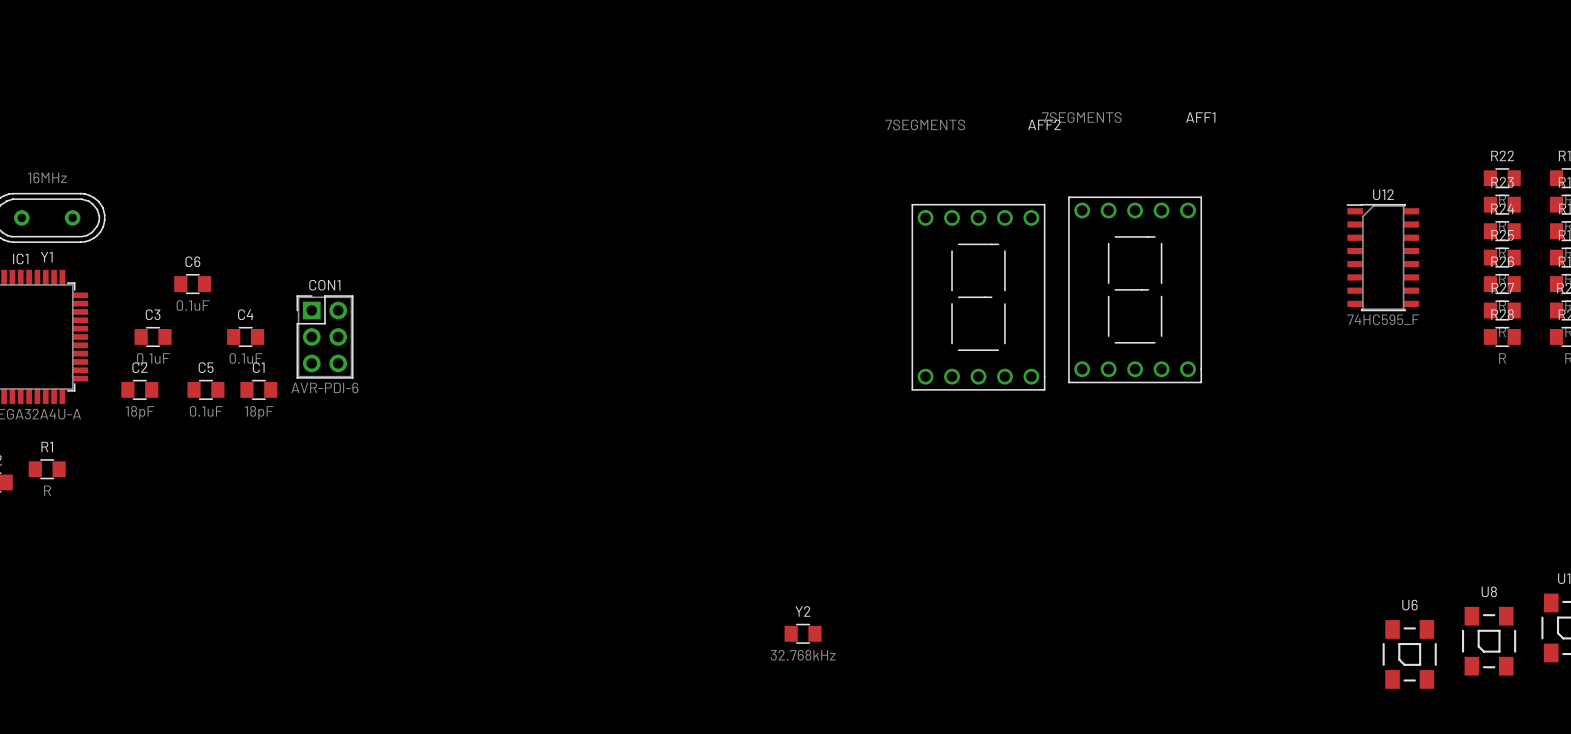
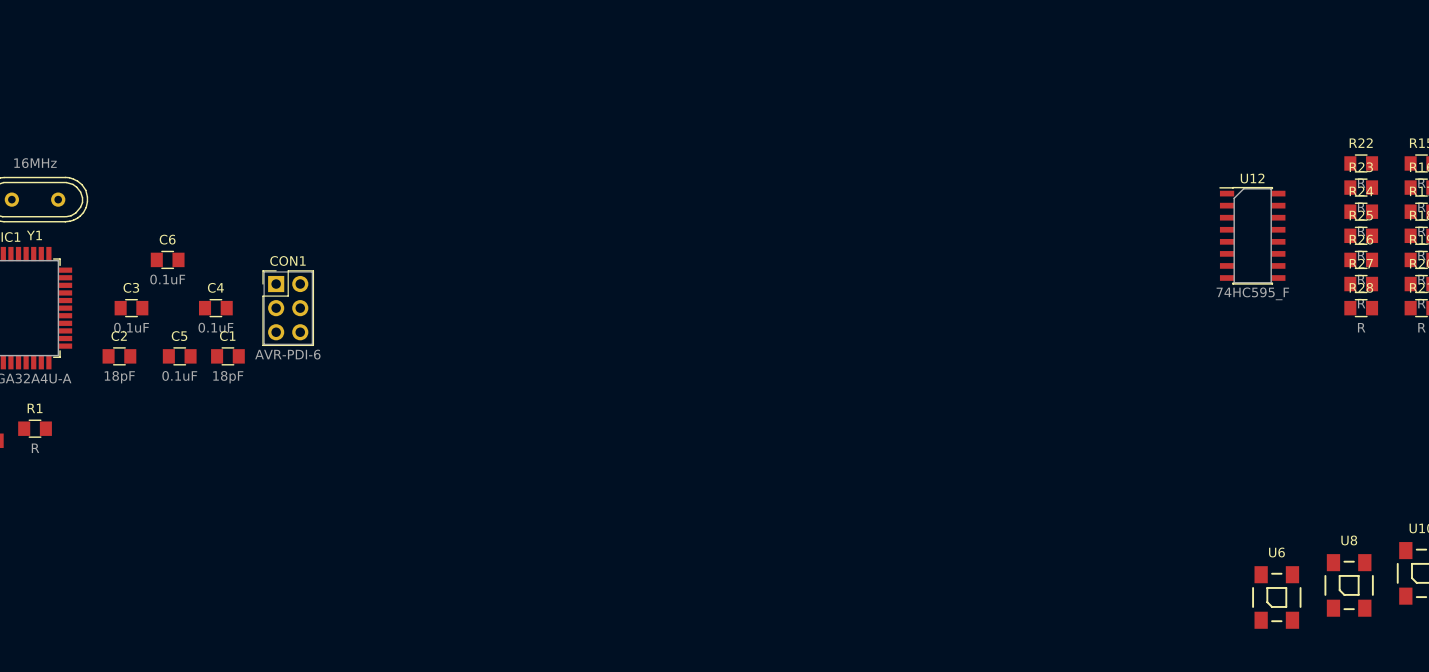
AFF1: 7SEGMENTS (1135, 289) -> none
AFF2: 7SEGMENTS (978, 297) -> none
Y2: 32.768kHz (803, 633) -> none

